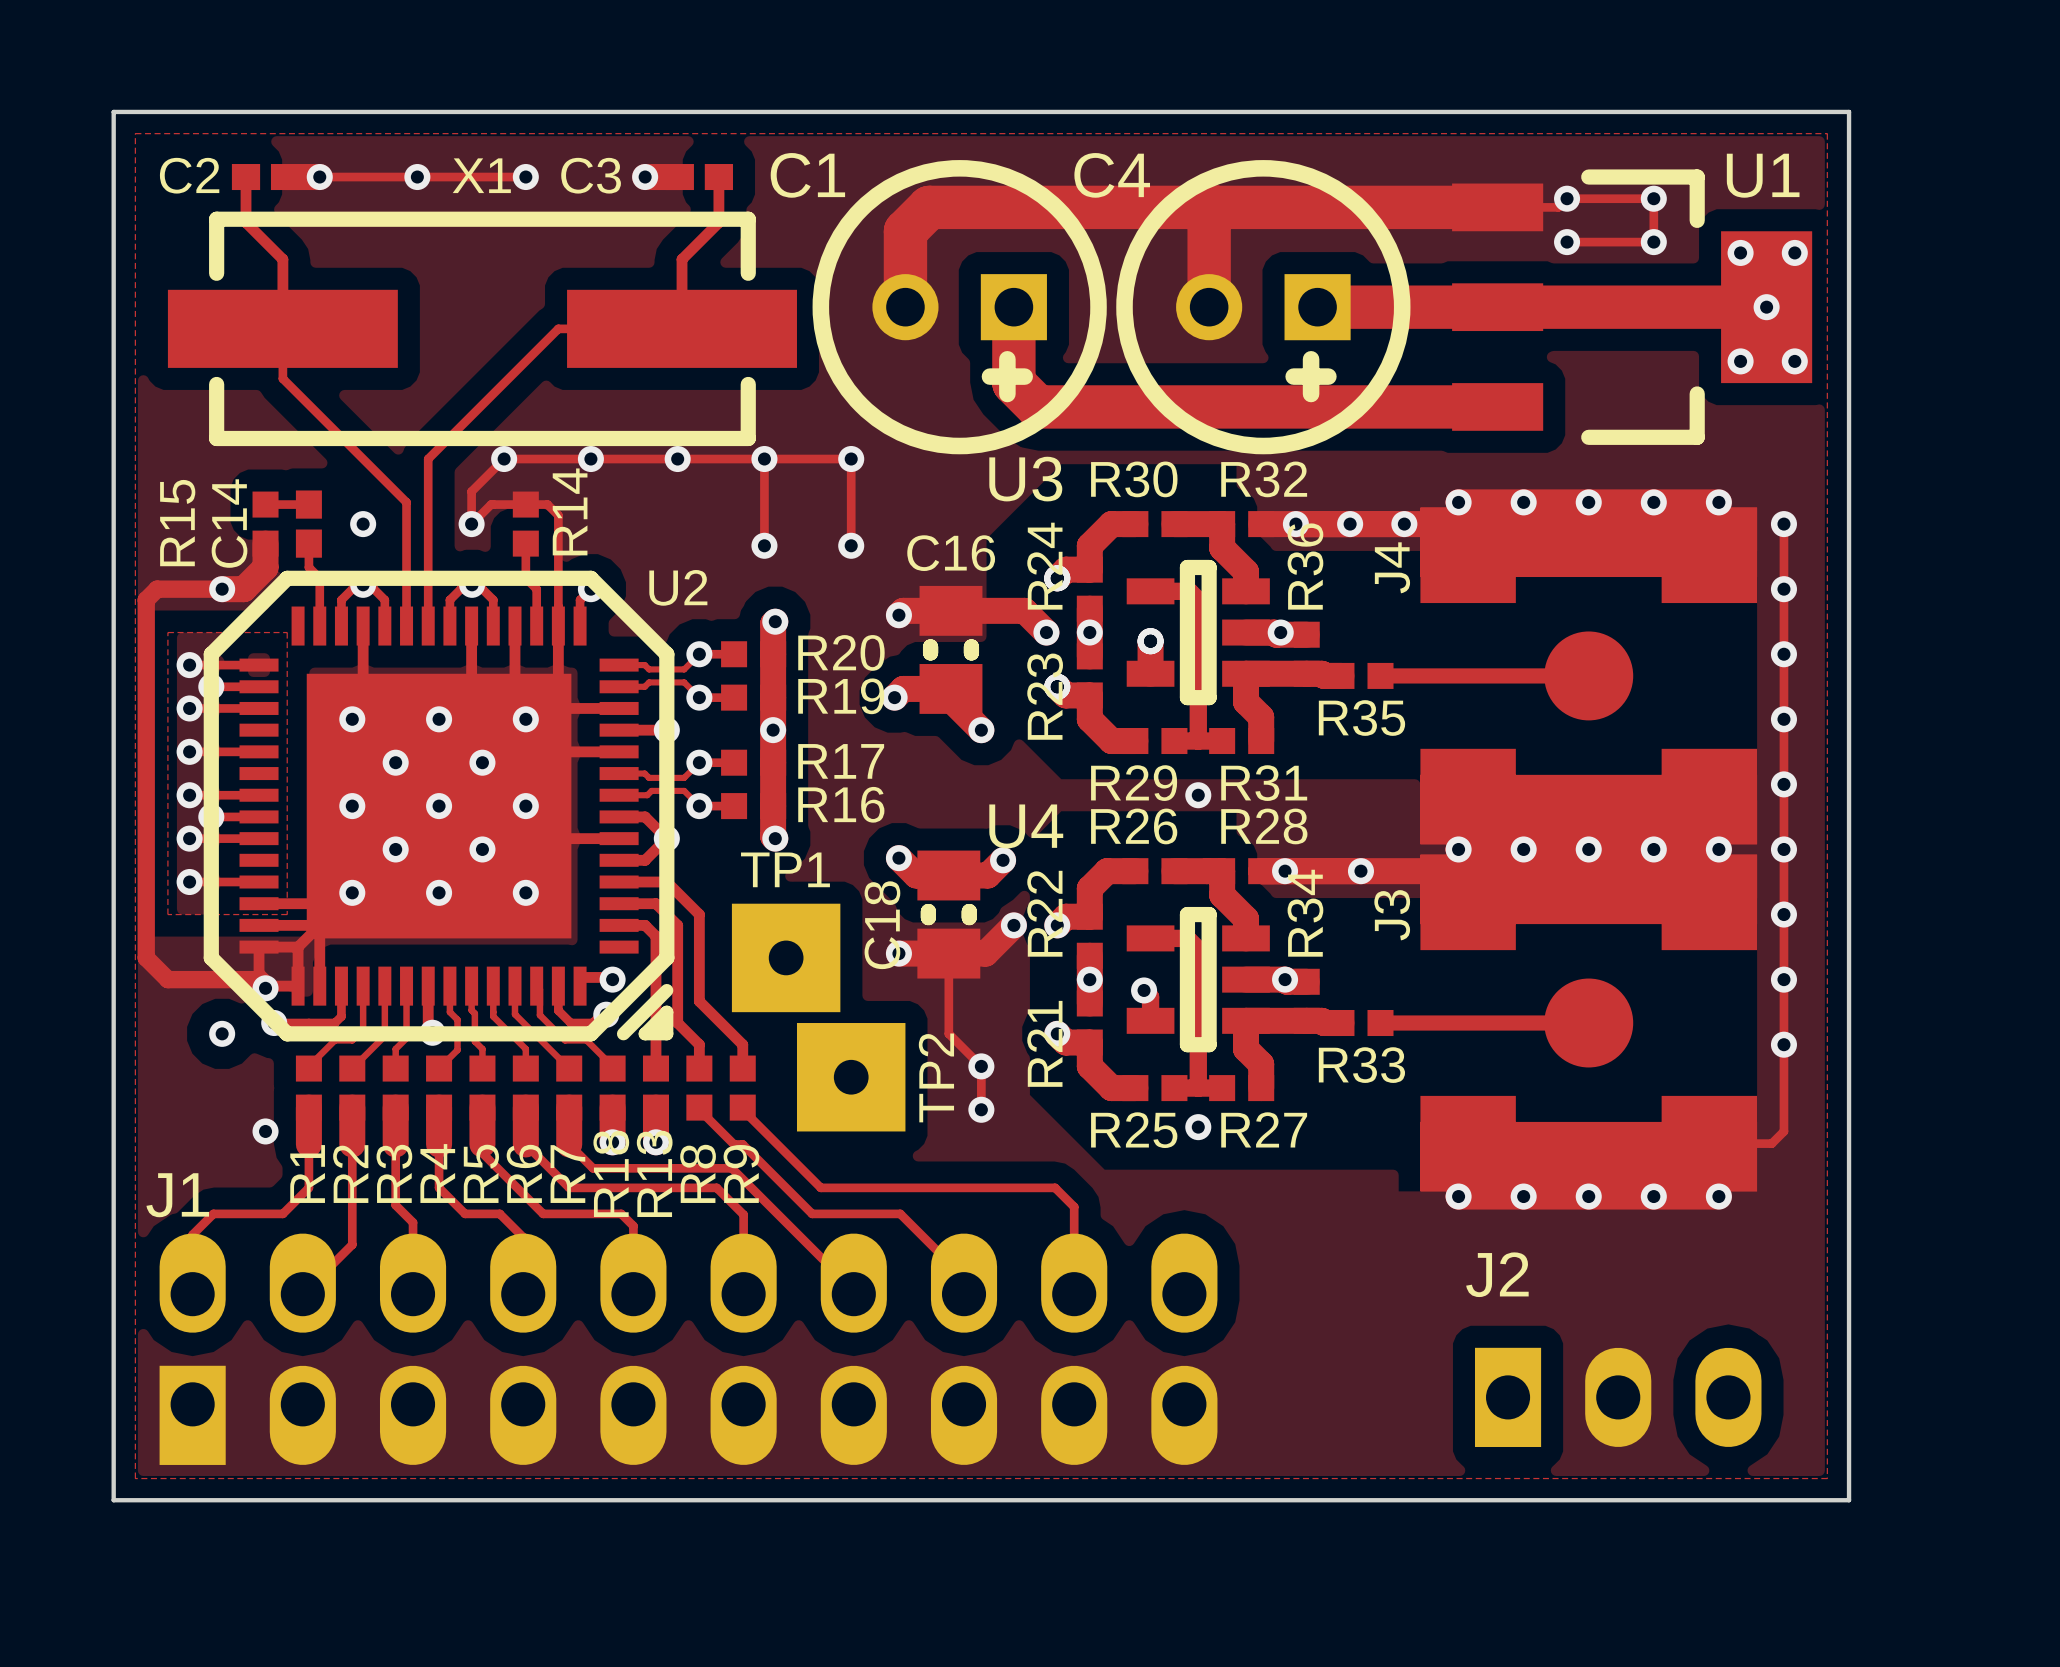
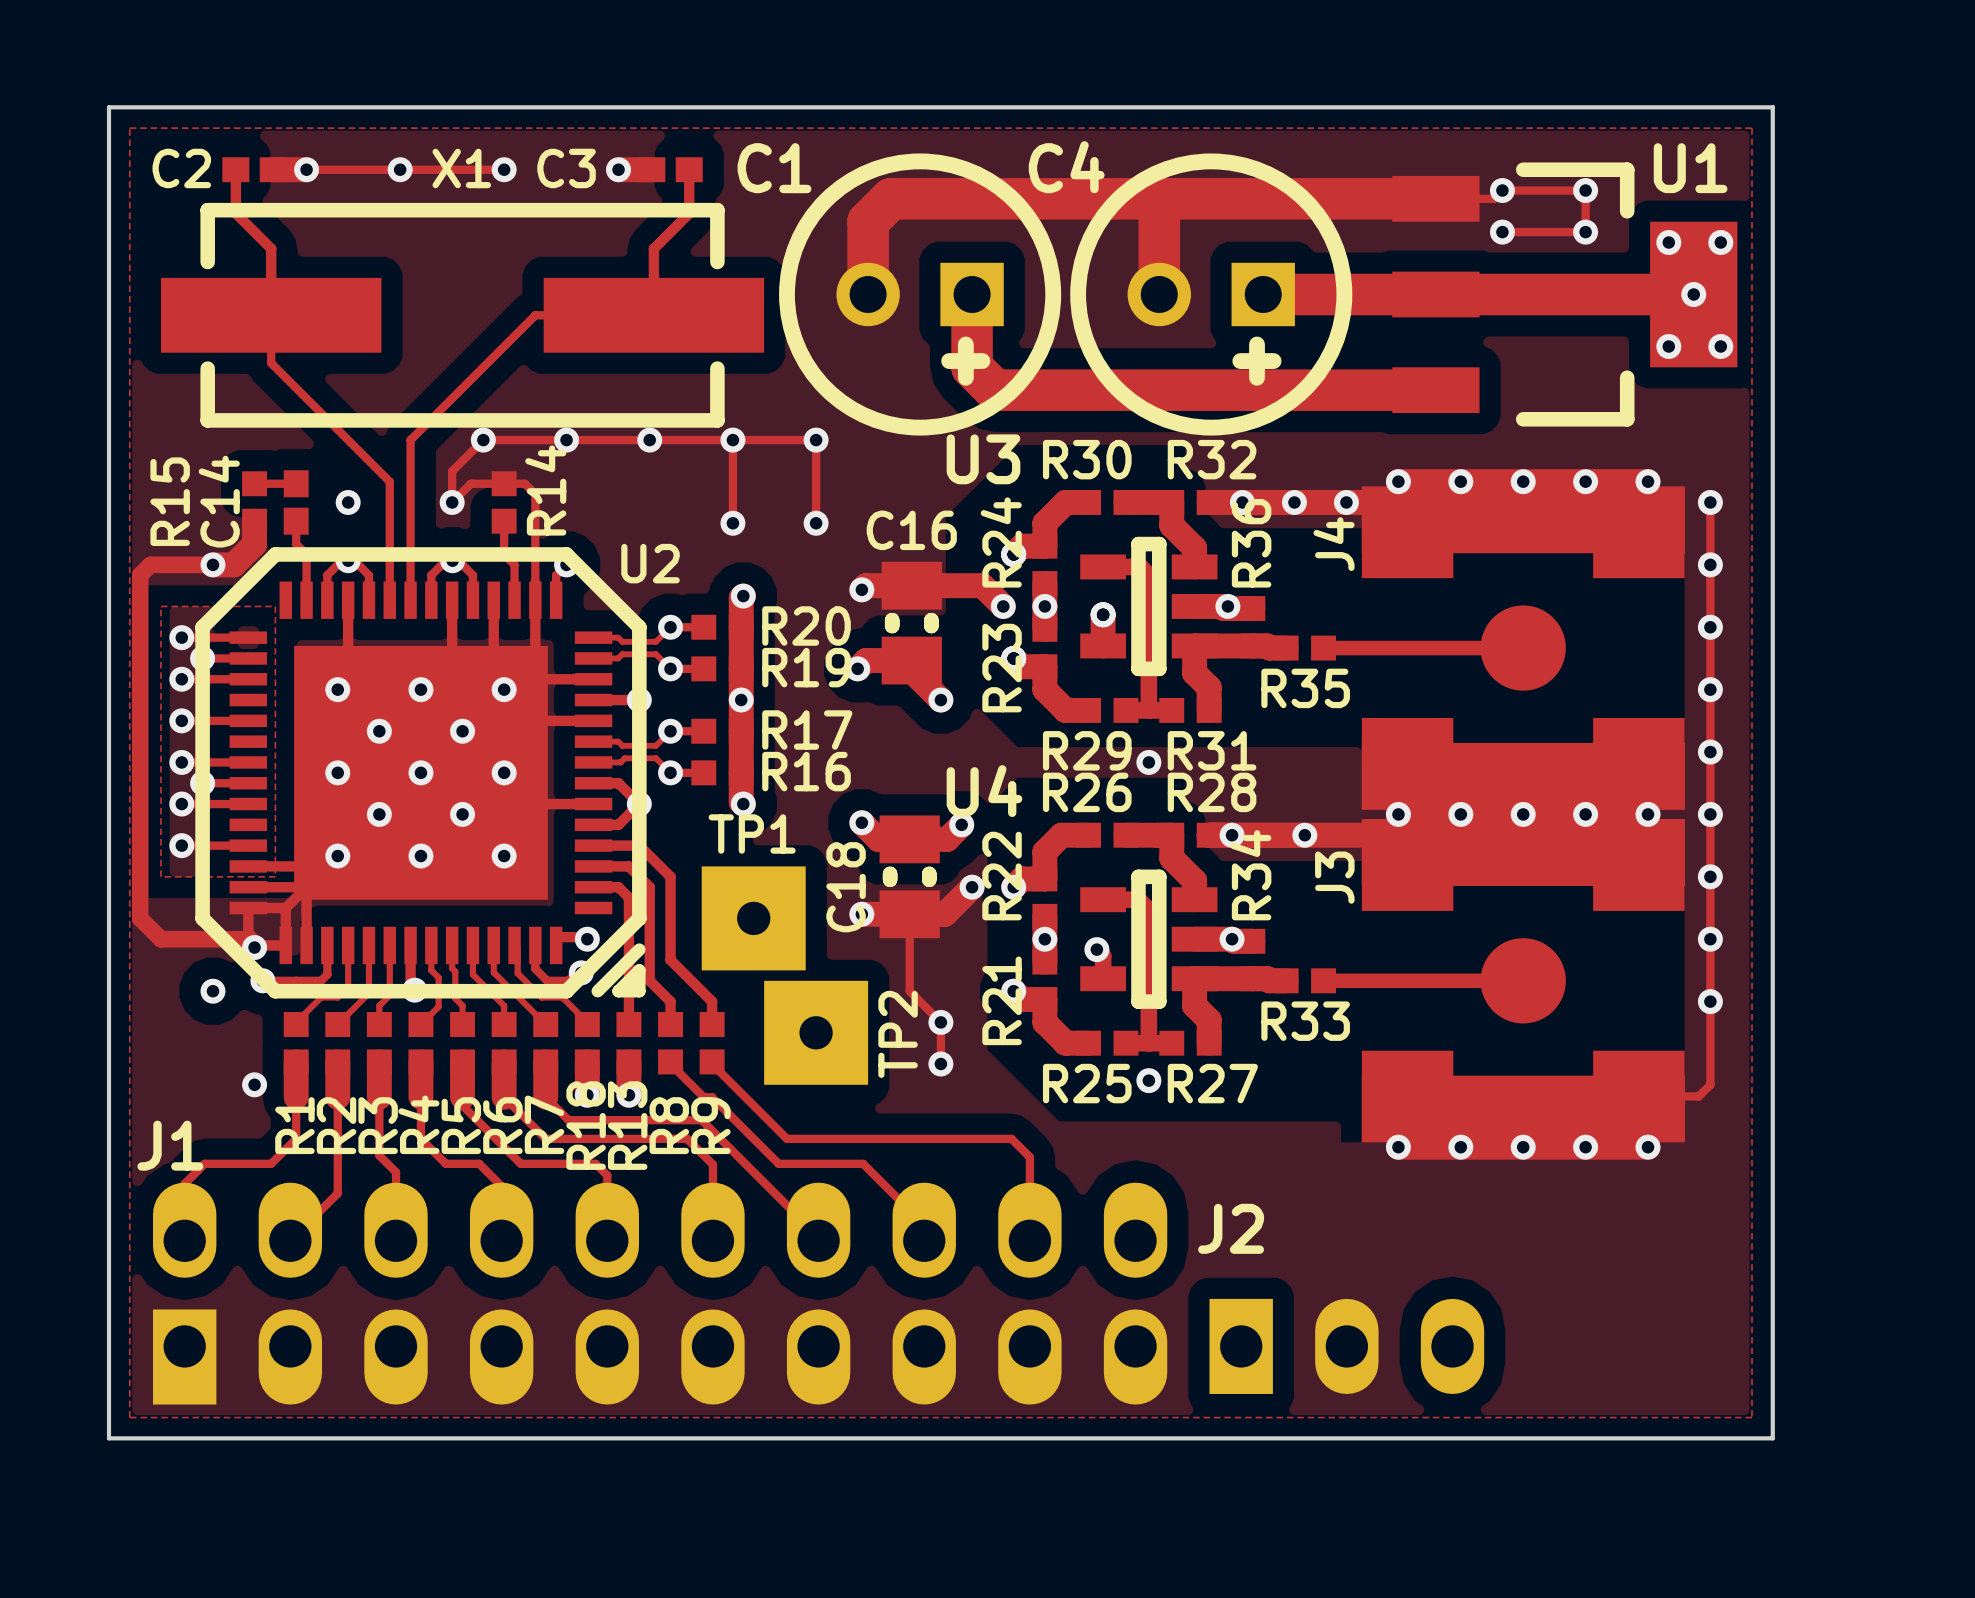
J2 position: (1618, 1397) -> (1346, 1346)

